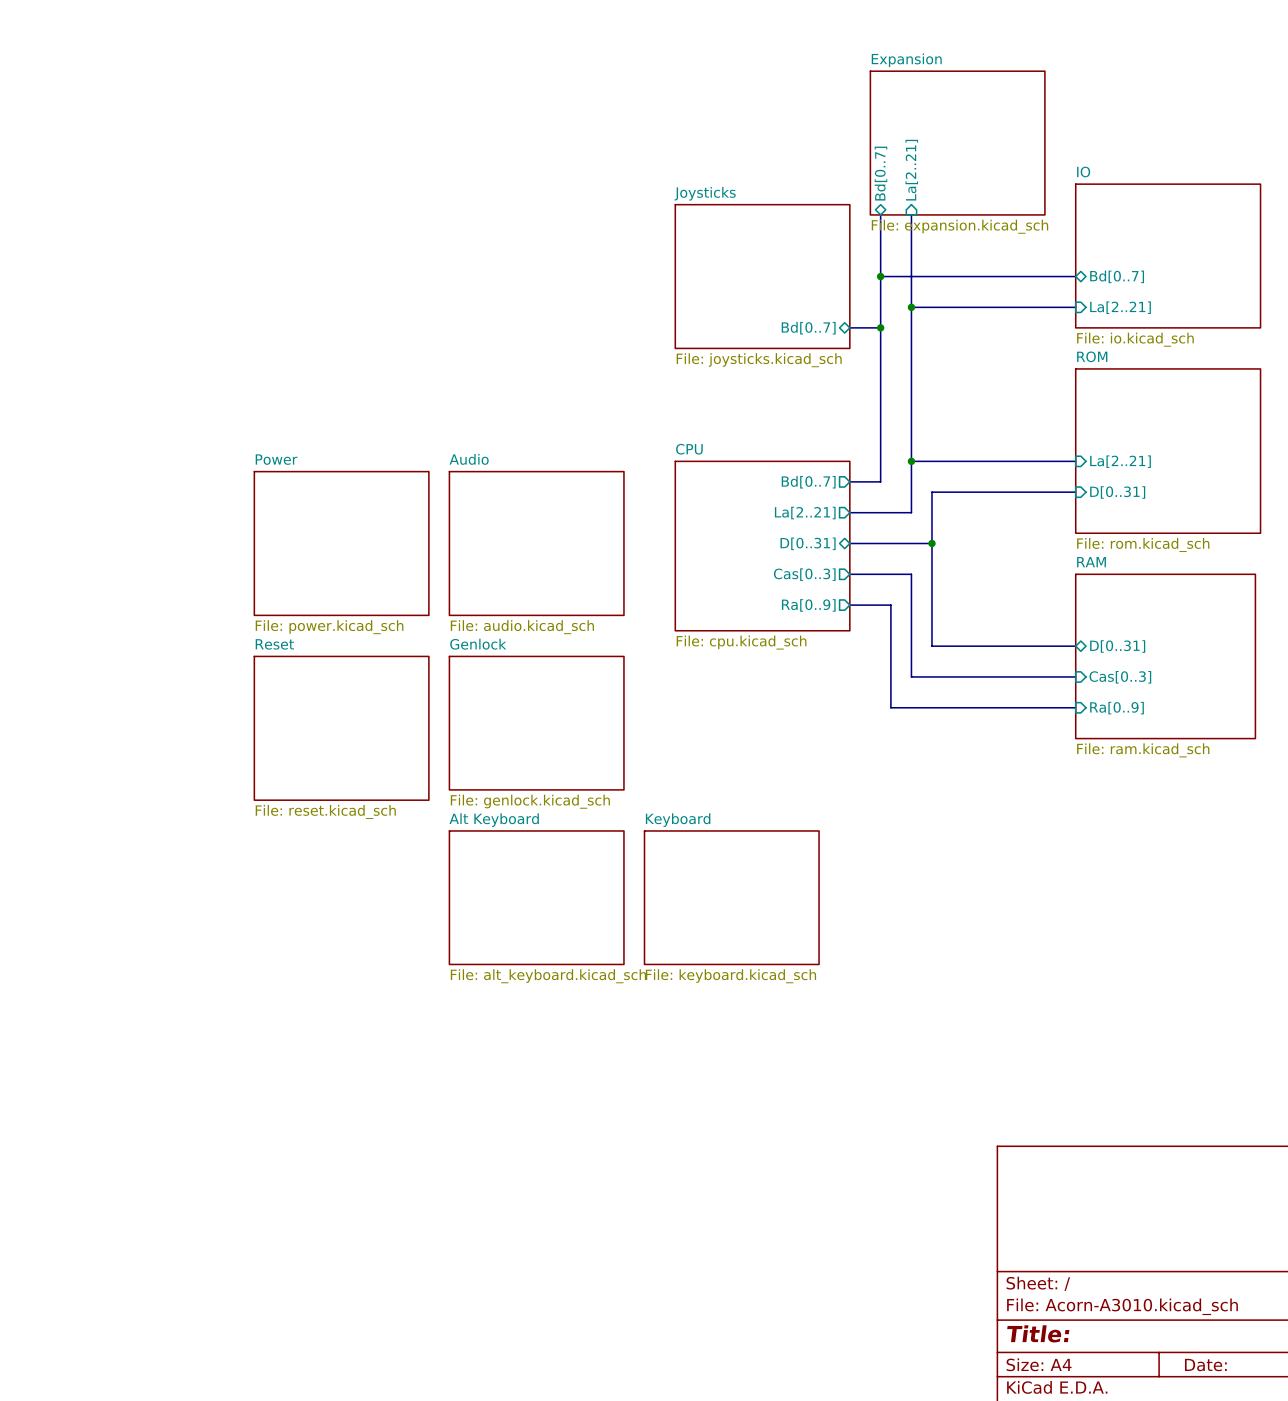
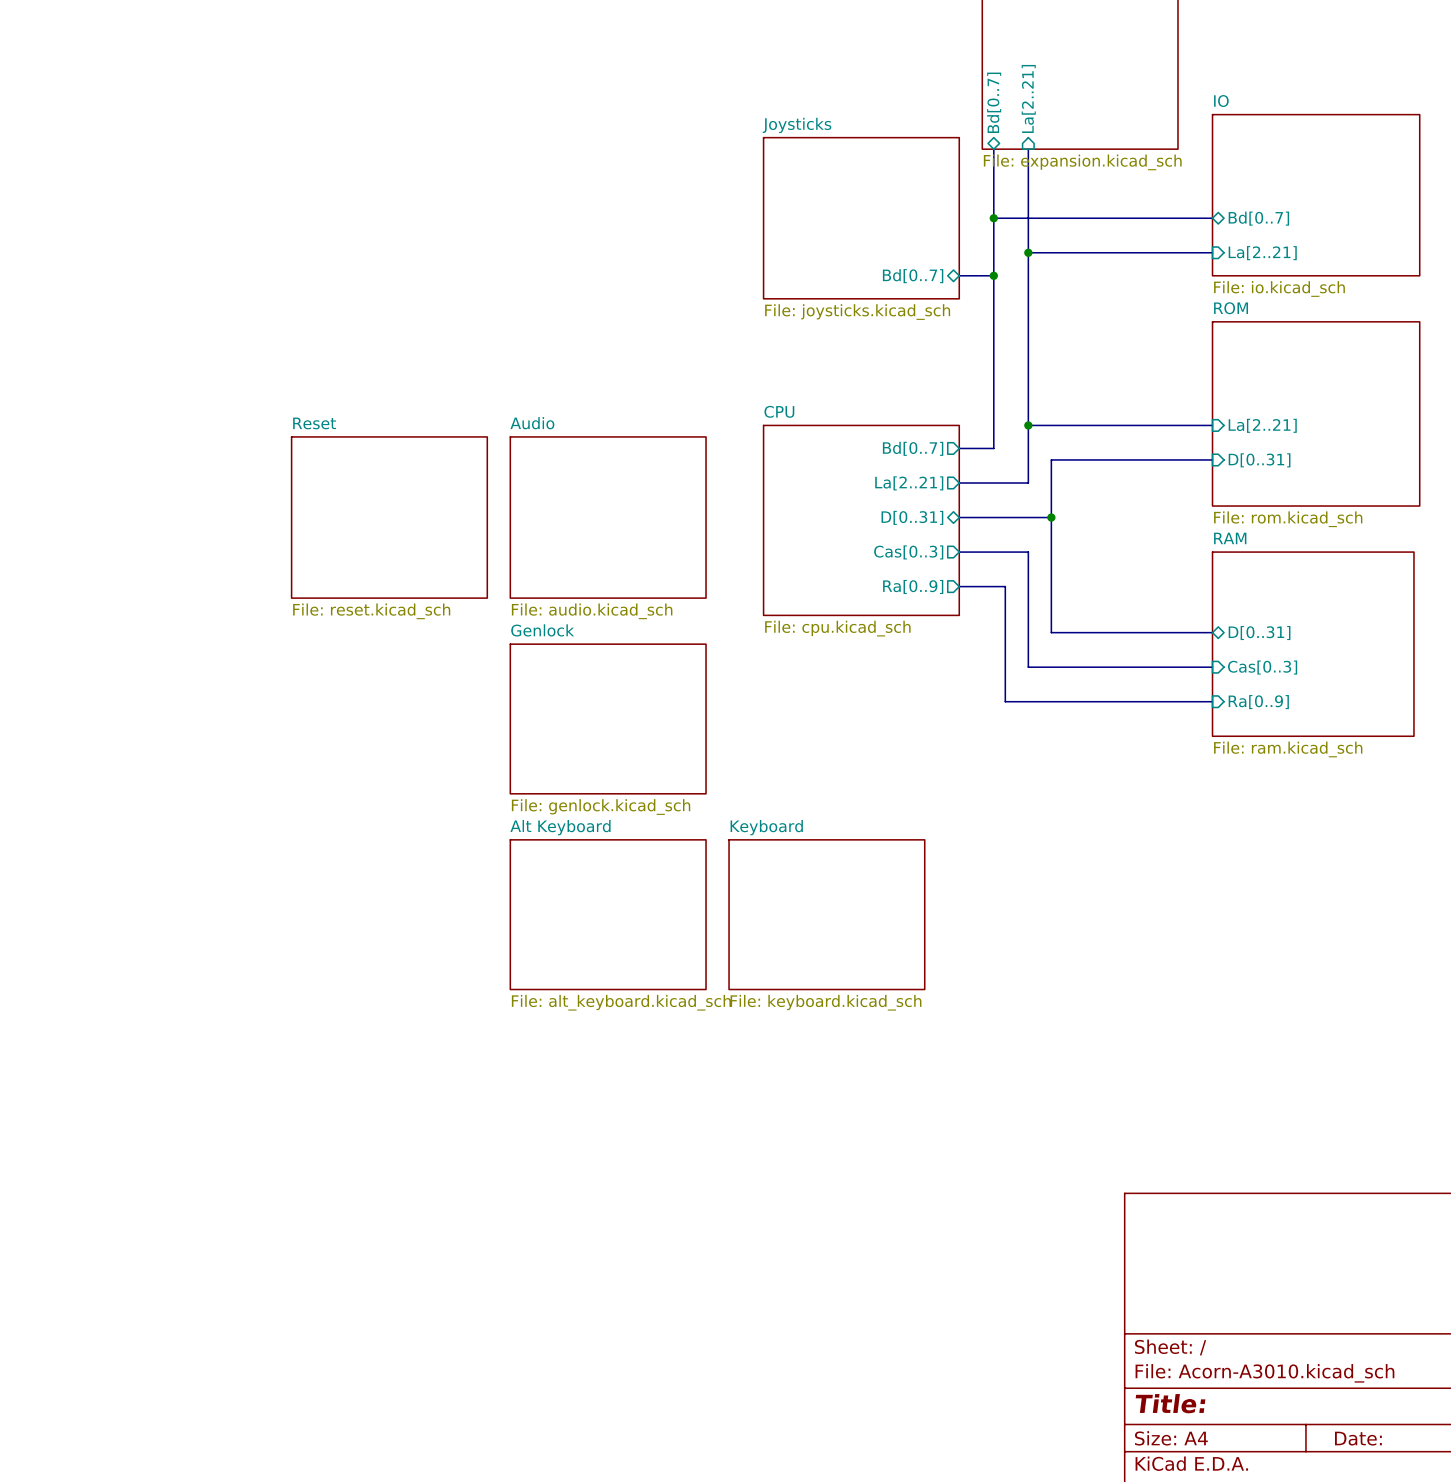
sheet Power name: Power (276, 459) -> Reset (314, 423)
sheet Power value: File: power.kicad_sch (329, 627) -> File: reset.kicad_sch (371, 611)
sheet Reset: File: reset.kicad_sch (341, 728) -> none

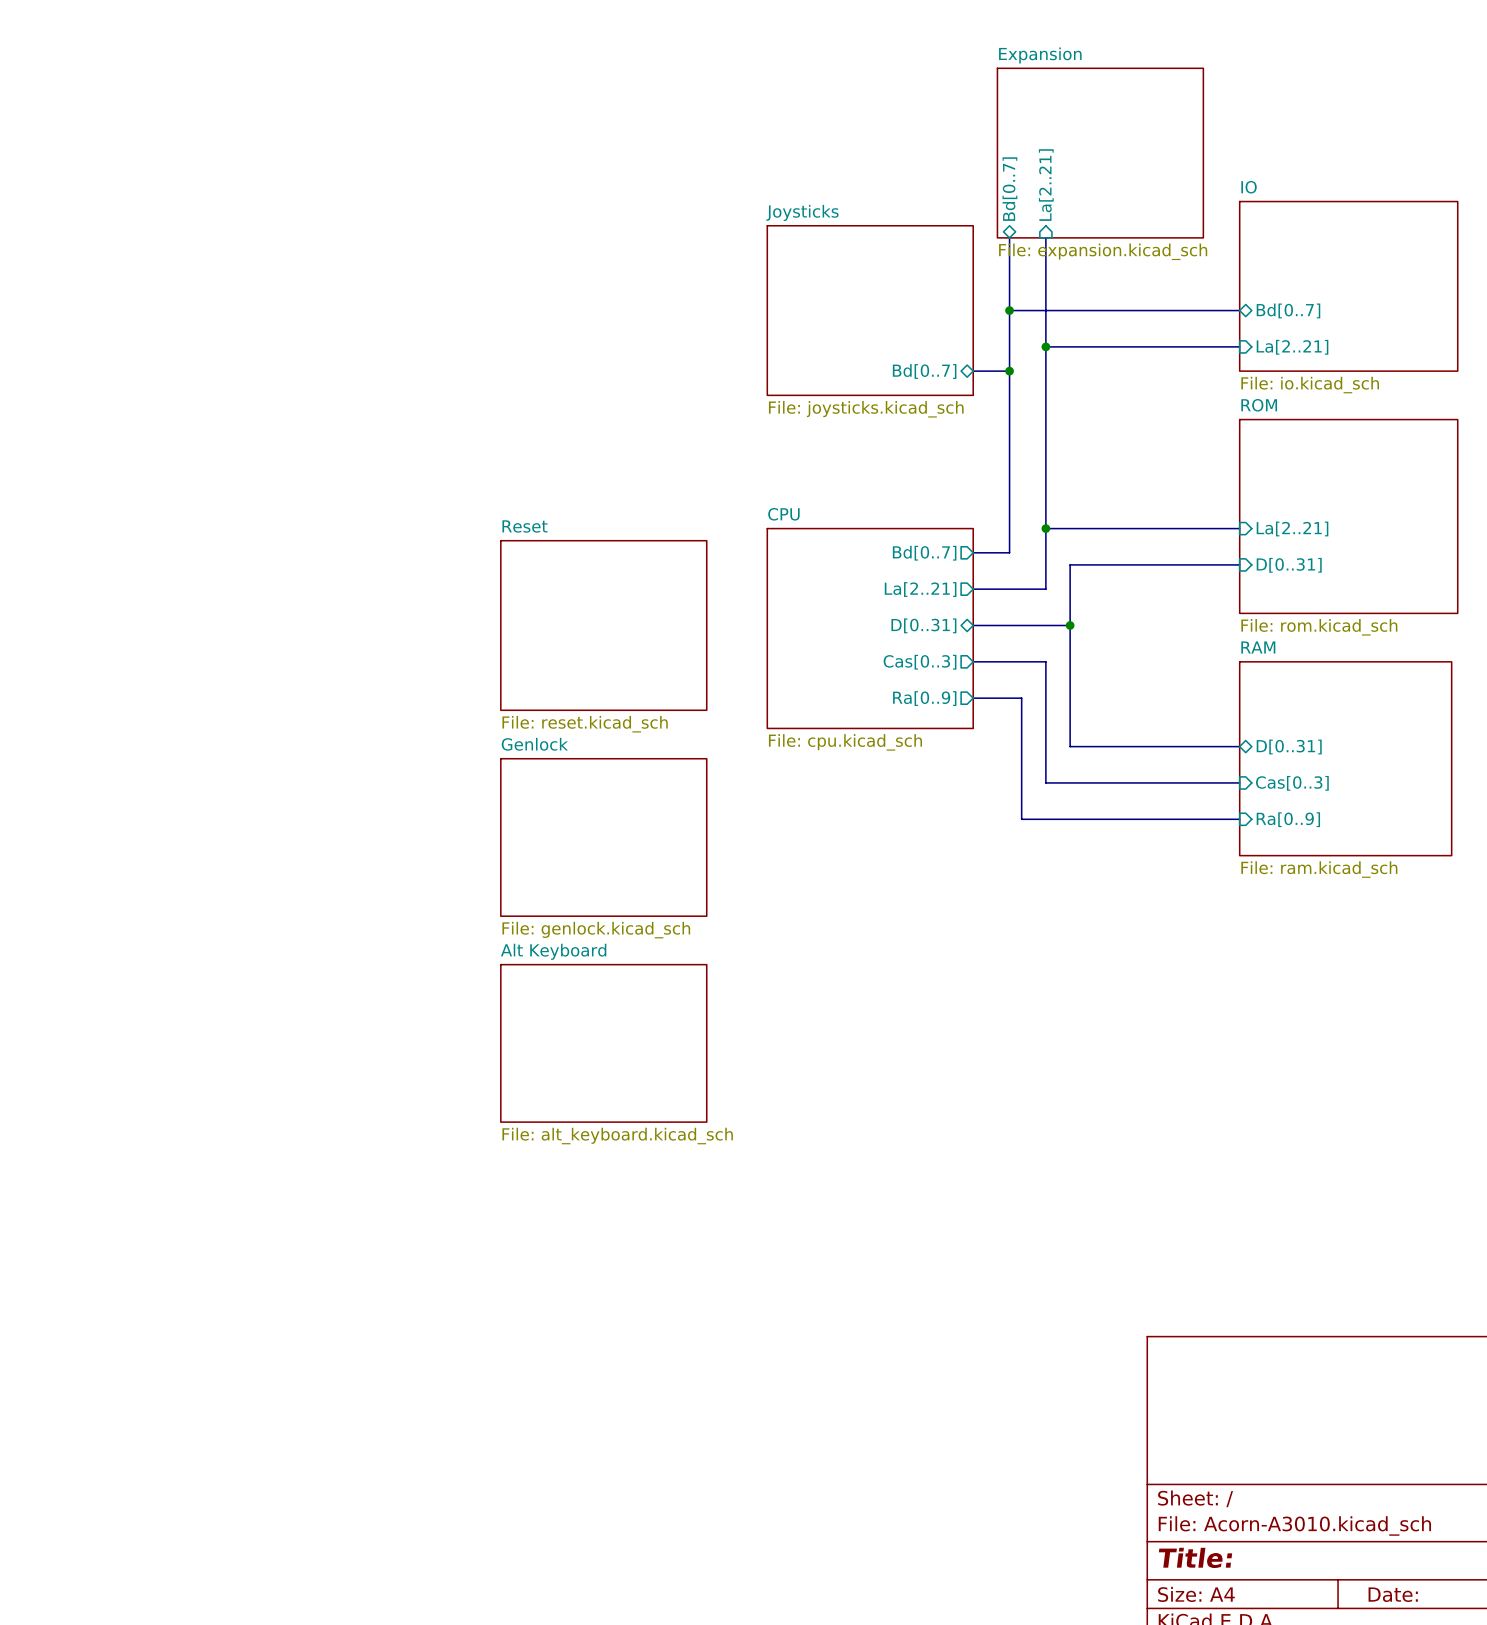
sheet Audio name: Audio (532, 423) -> Reset (525, 526)
sheet Reset: File: reset.kicad_sch (389, 517) -> none
sheet Audio value: File: audio.kicad_sch (592, 611) -> File: reset.kicad_sch (585, 724)
sheet Keyboard: File: keyboard.kicad_sch (826, 914) -> none

